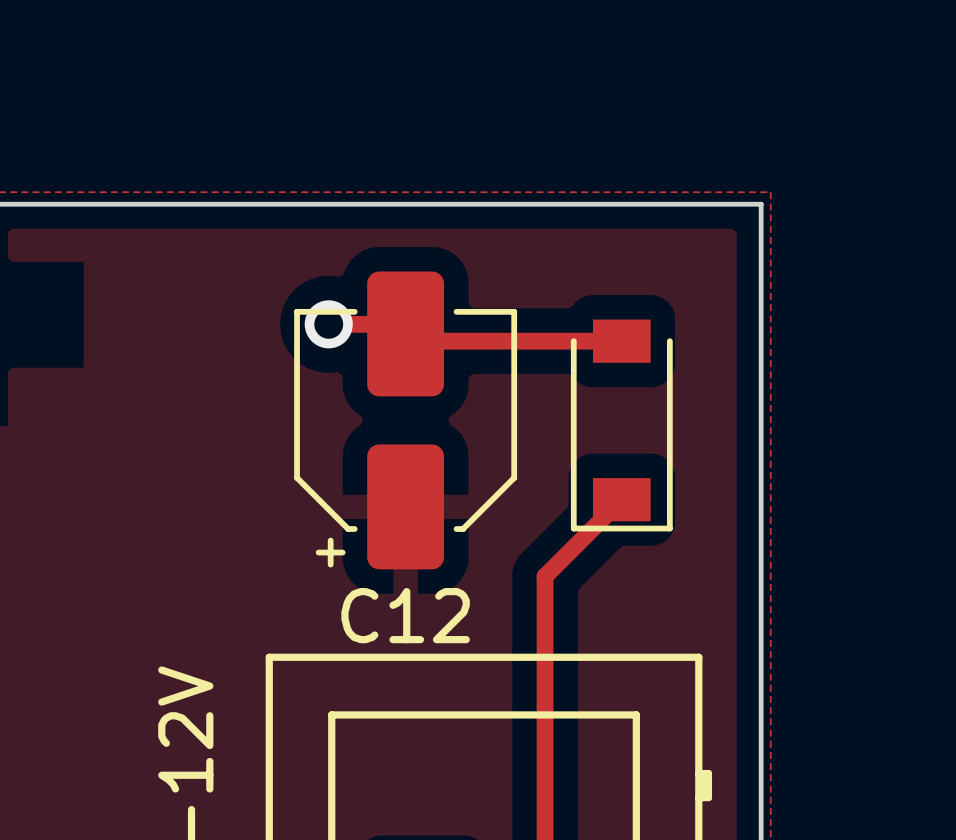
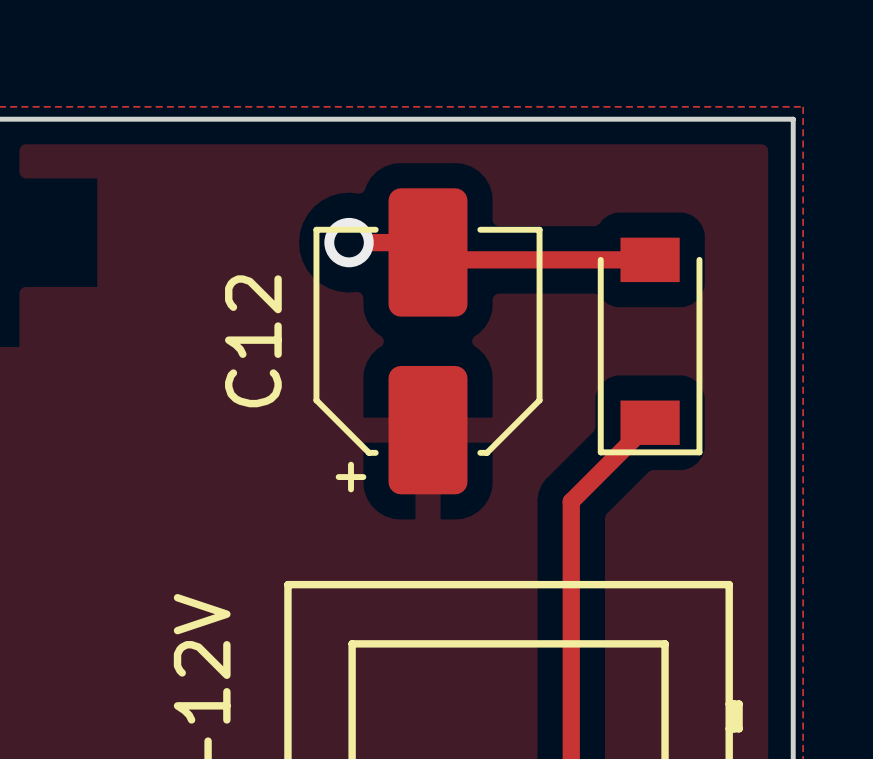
C12 name rotation: 0° (405, 615) -> 90° counterclockwise (253, 341)
C12 name position: C12 (405, 615) -> C12 (253, 341)

